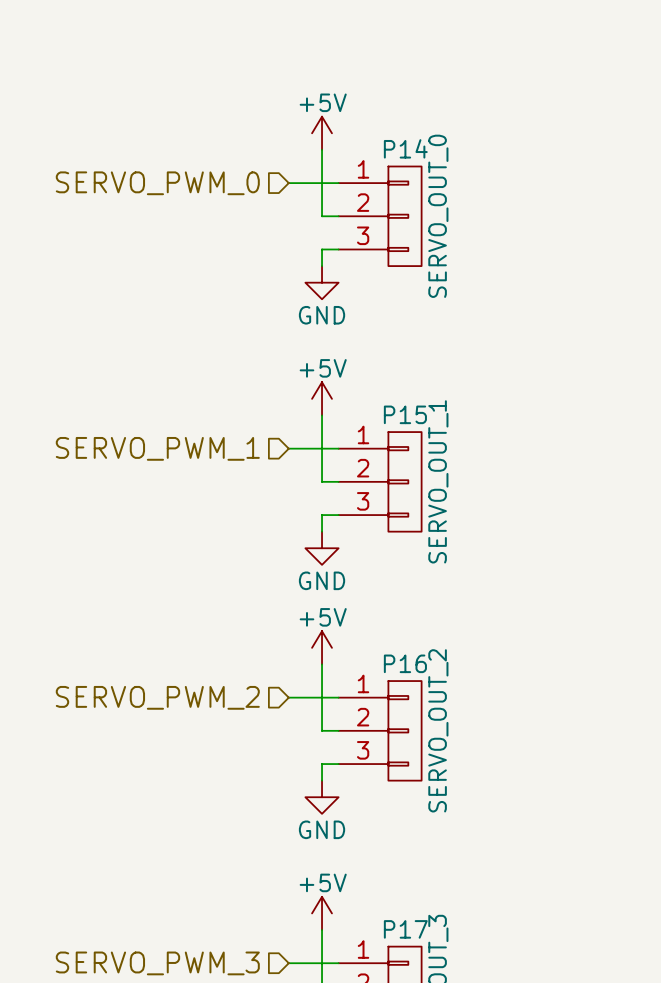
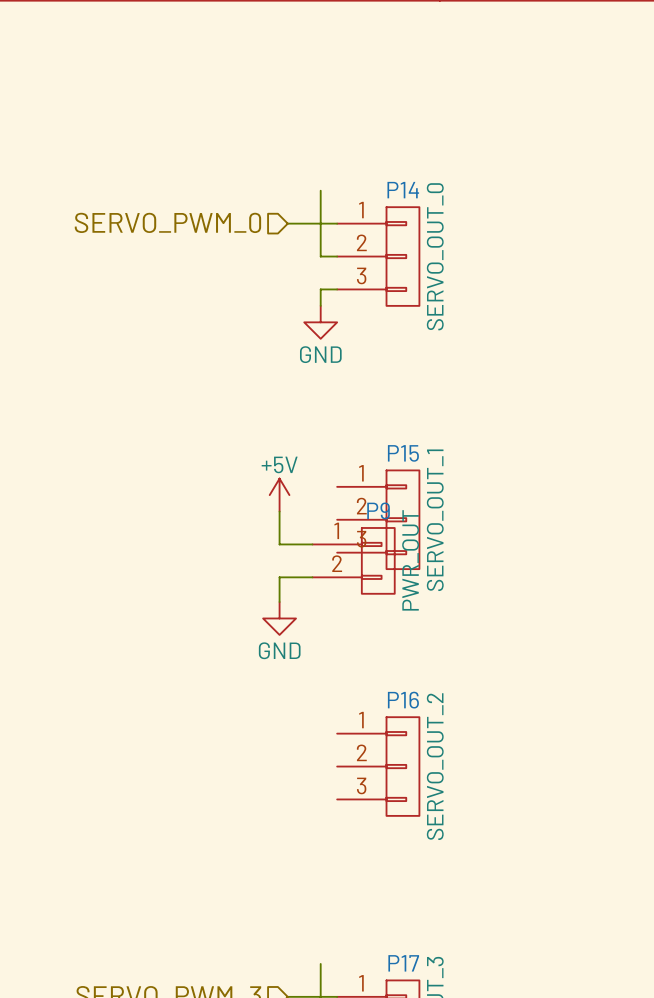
power symbol: +5V (322, 133) -> none
power symbol position: +5V (322, 398) -> +5V (279, 495)
wire: (322, 415) (322, 481) (338, 481) -> none
hierarchical label: SERVO_PWM_1 (157, 448) -> none
wire: (288, 448) (338, 448) -> none
wire: none -> (279, 511) (279, 544) (312, 544)
wire: (338, 515) (322, 515) (322, 531) -> none
P9: none -> PWR_OUT (353, 560)
wire: none -> (312, 577) (279, 577) (279, 602)
power symbol position: GND (322, 548) -> GND (279, 618)
power symbol: +5V (322, 647) -> none
wire: (322, 664) (322, 730) (338, 730) -> none
hierarchical label: SERVO_PWM_2 (157, 697) -> none
wire: (288, 697) (338, 697) -> none
wire: (338, 764) (322, 764) (322, 780) -> none
power symbol: GND (322, 797) -> none
power symbol: +5V (322, 913) -> none

